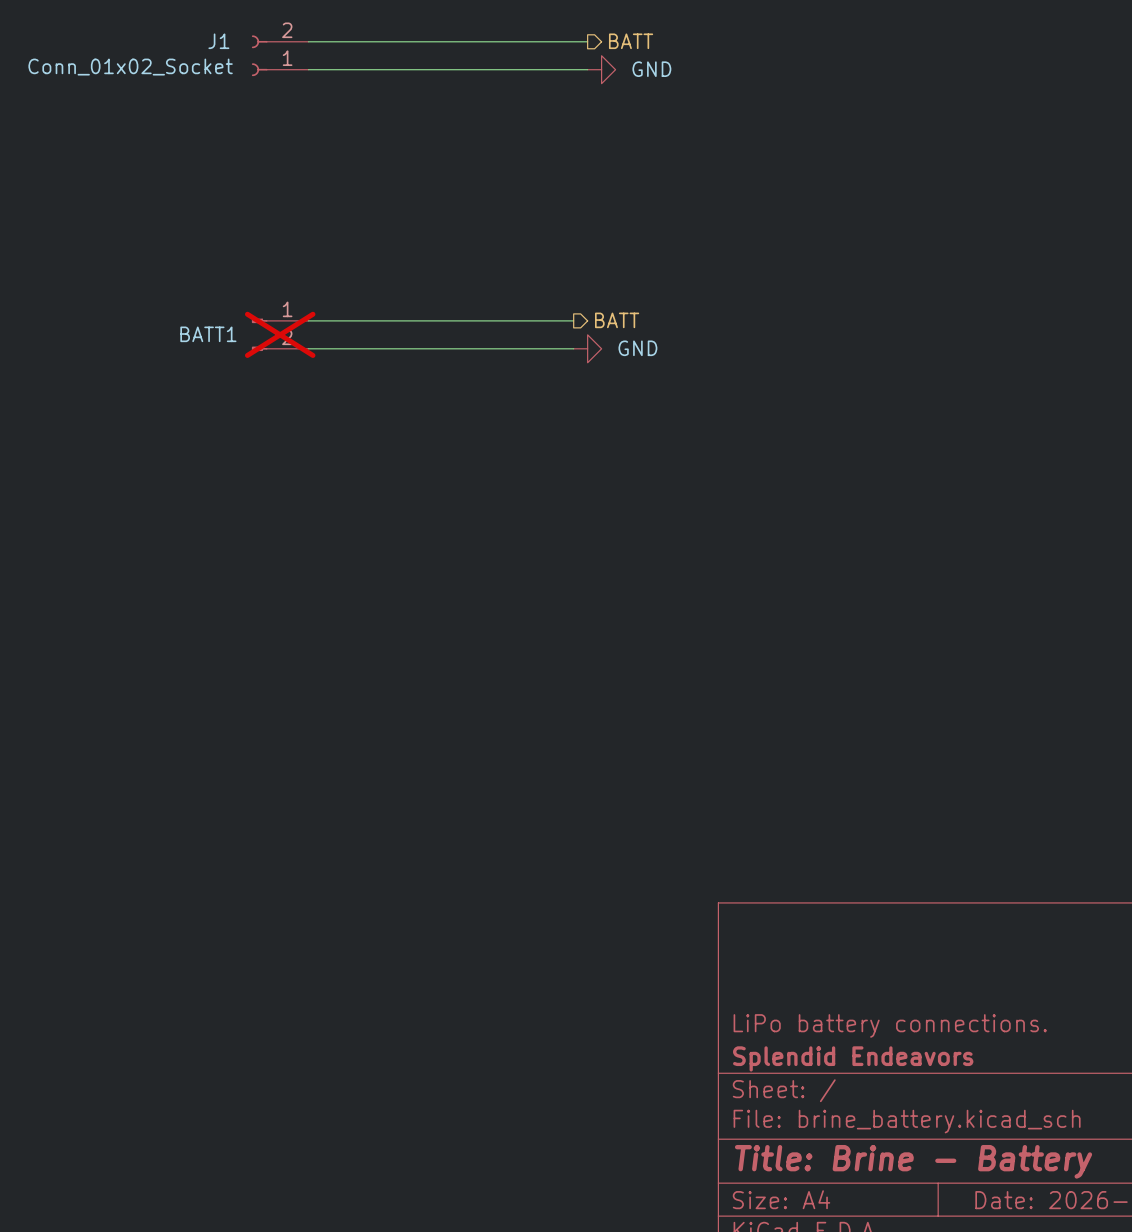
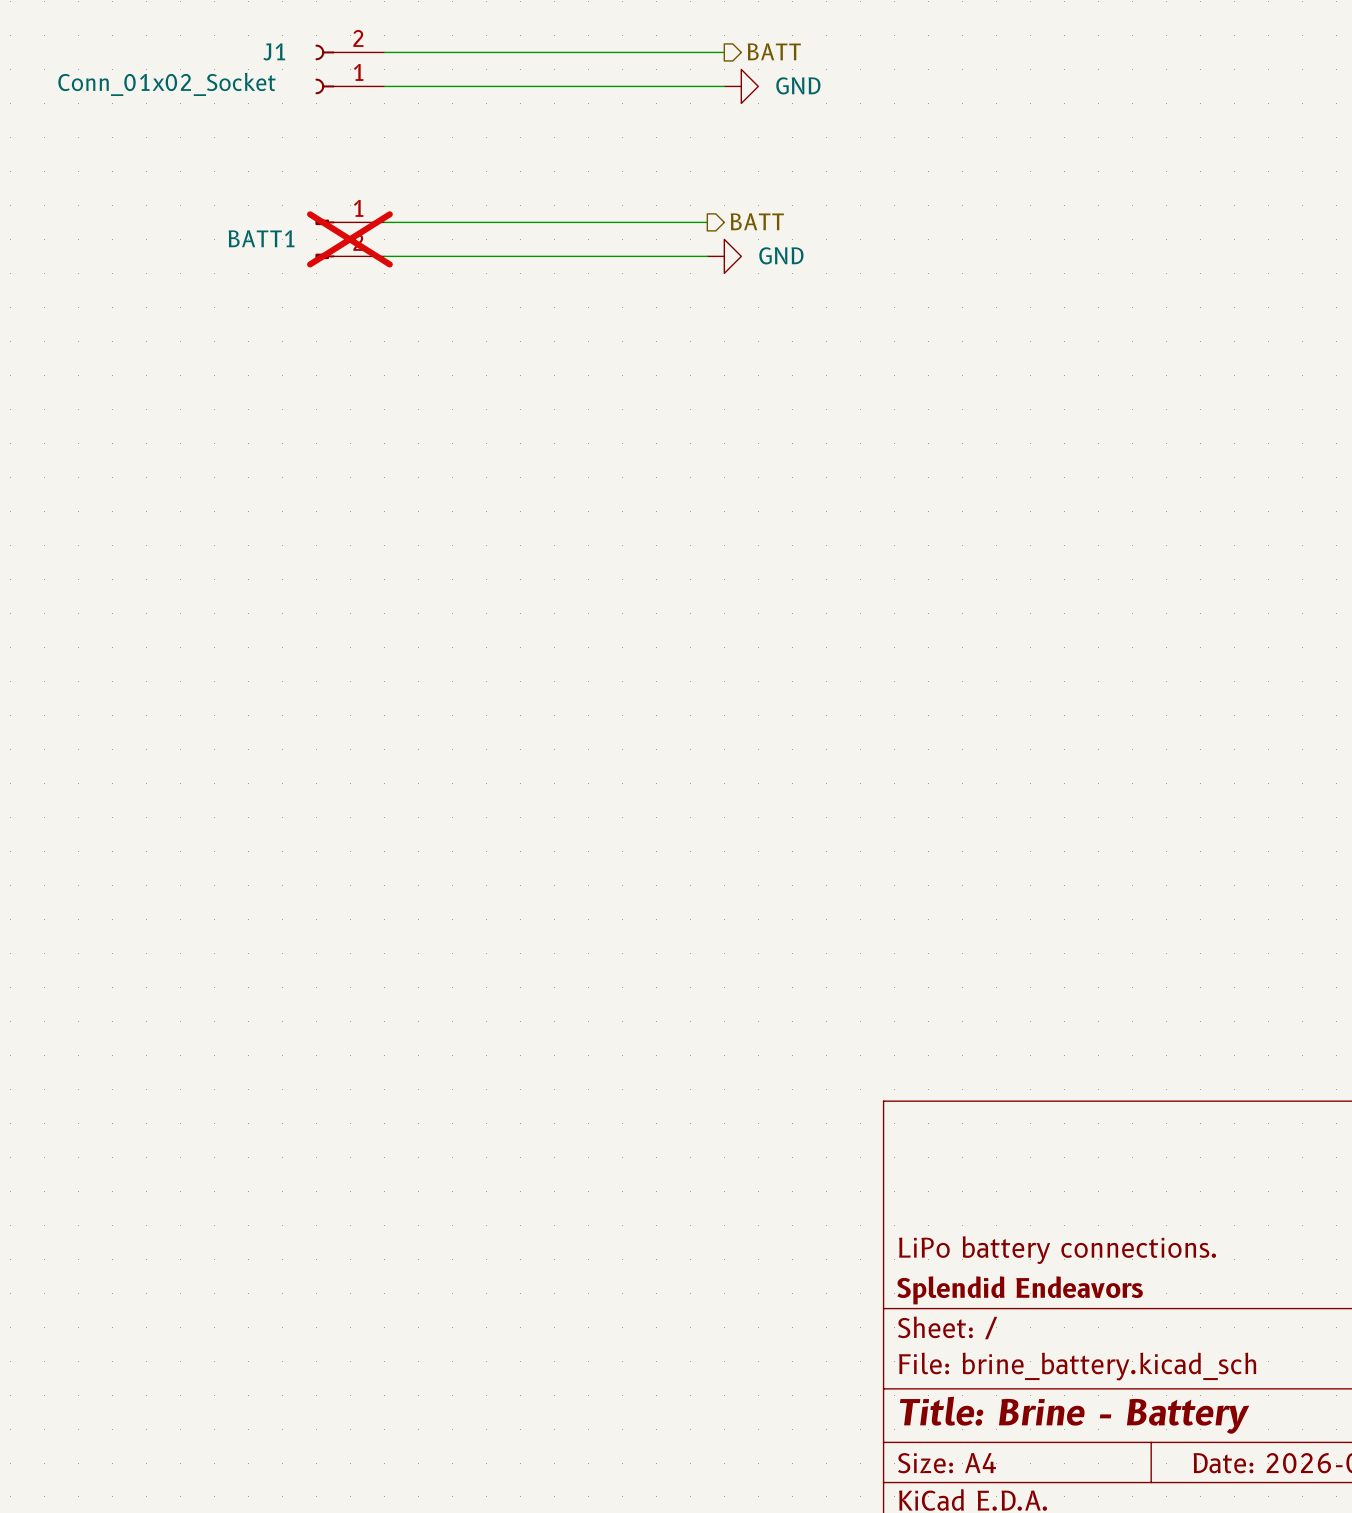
wire: (308, 320) (573, 320) -> (384, 222) (707, 222)
hierarchical label position: BATT (617, 320) -> BATT (757, 221)
BATT1 position: (280, 334) -> (349, 239)
wire: (308, 348) (573, 348) -> (384, 256) (707, 256)
power symbol position: GND (587, 348) -> GND (724, 256)

